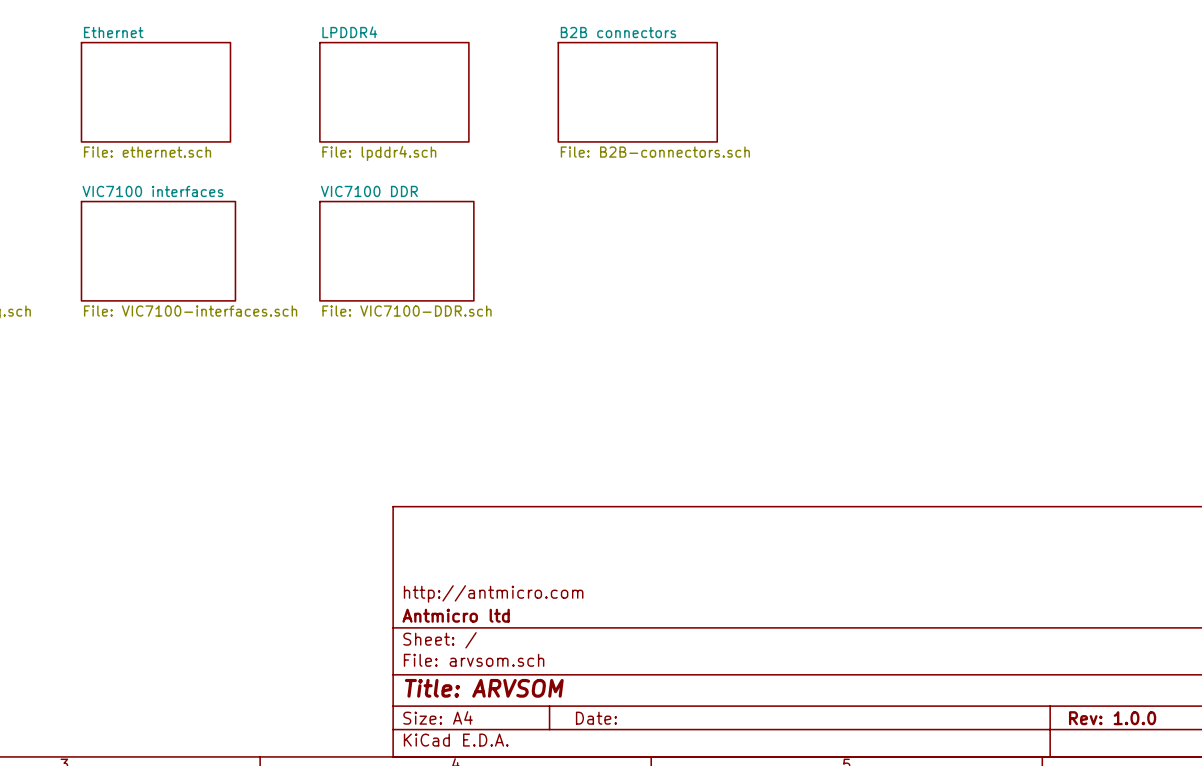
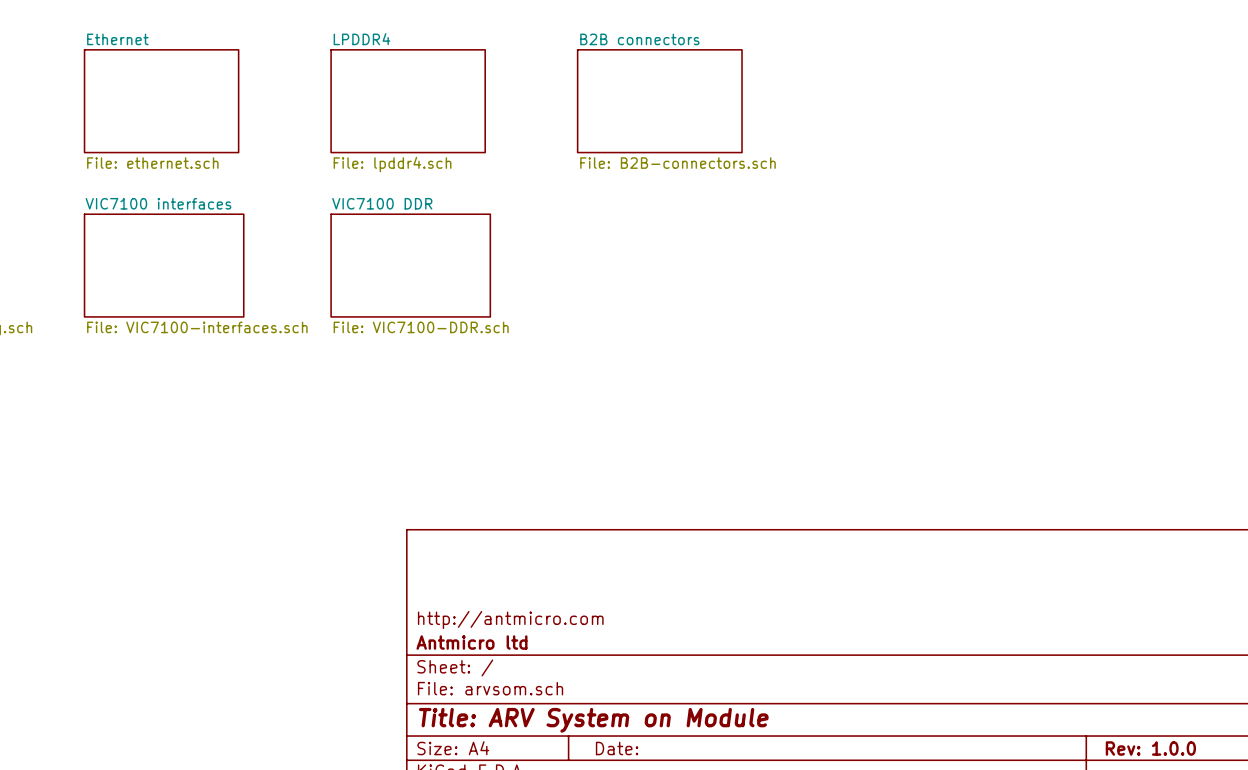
title block: Title: ARVSOM (484, 688) -> Title: ARV System on Module (593, 720)

